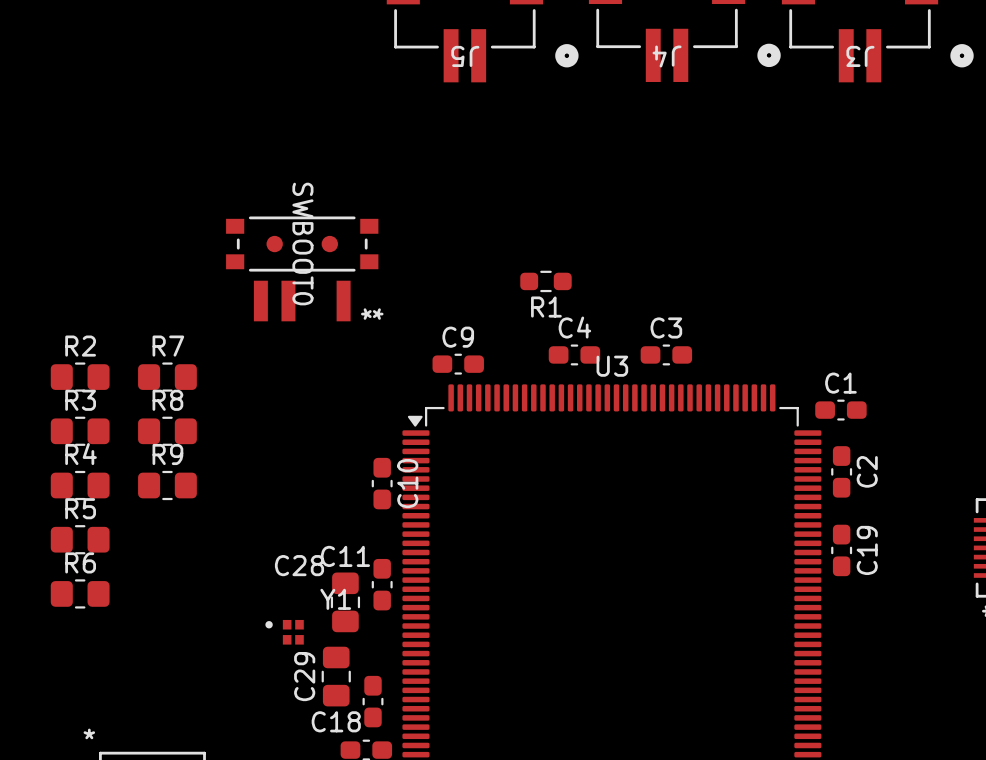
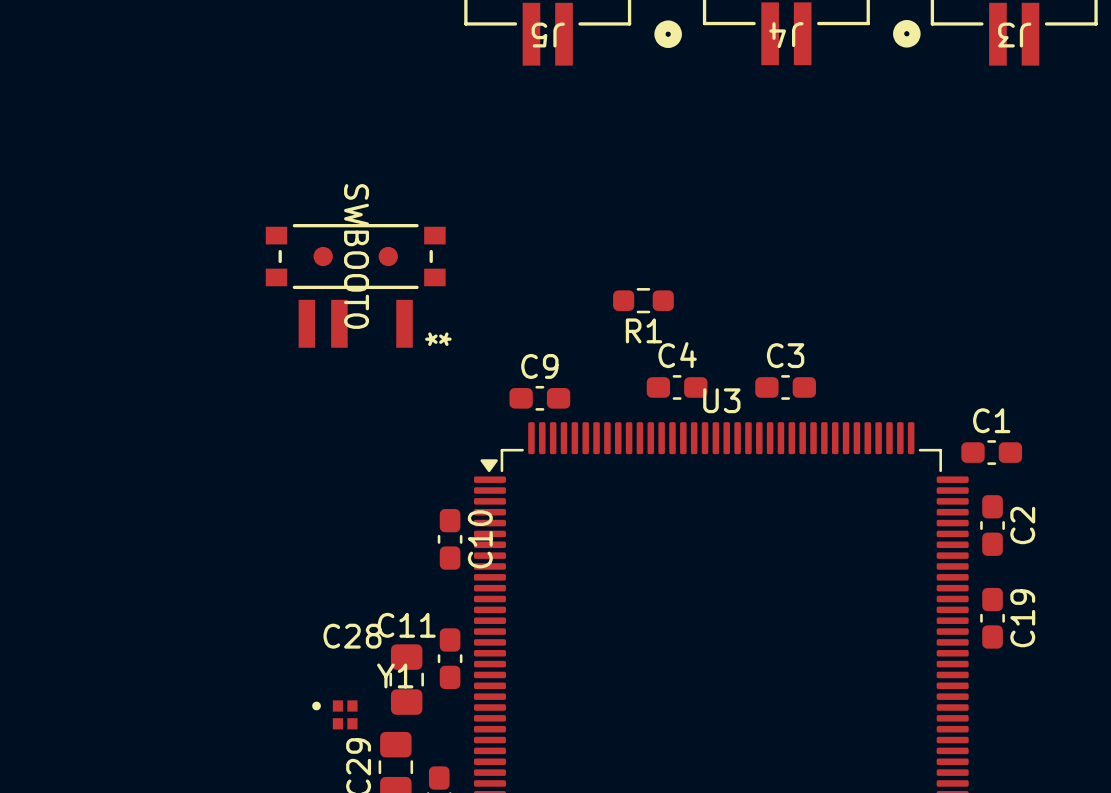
R2: (80, 377) -> none
R7: (167, 377) -> none
R3: (80, 431) -> none
R8: (167, 431) -> none
R4: (80, 485) -> none
R9: (167, 485) -> none
R5: (80, 539) -> none
R6: (80, 593) -> none

